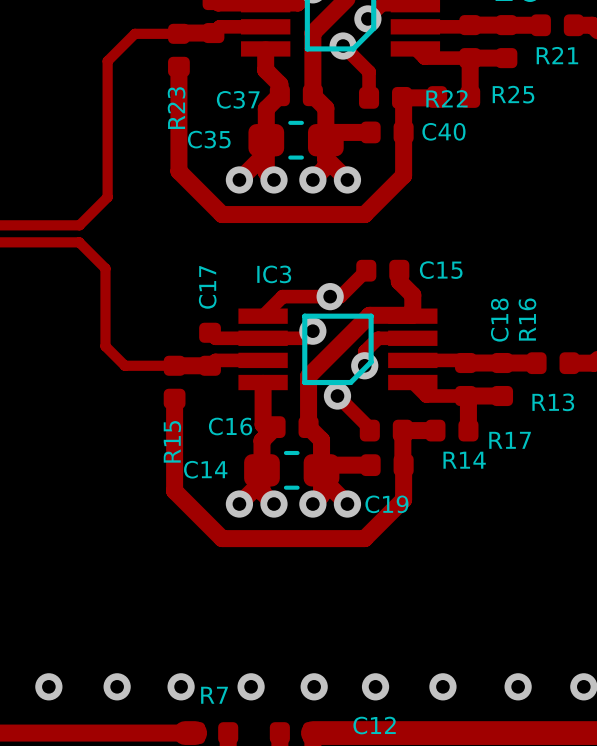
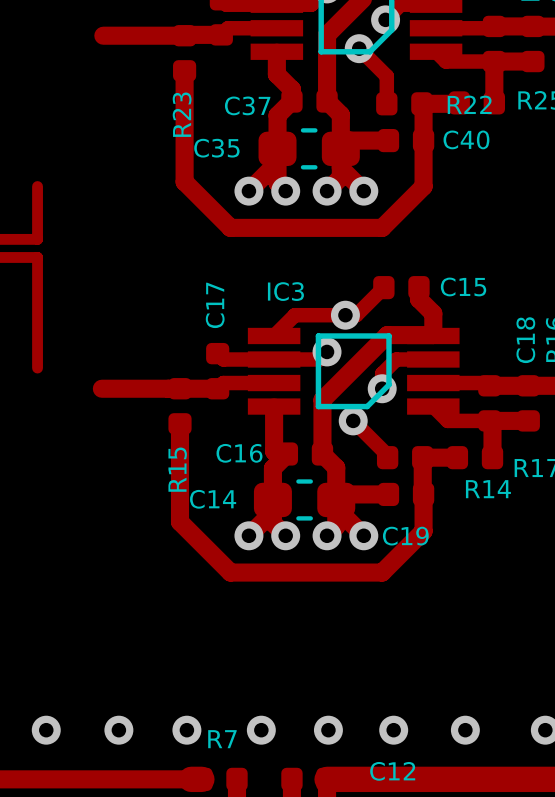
track: none -> (103, 35) (137, 35)
track: (134, 33) (107, 61) (107, 197) (79, 225) (40, 225) -> (37, 186) (37, 239)
track width: thin (134, 33) (178, 33) -> thick (137, 35) (184, 35)
track: (40, 242) (79, 242) (105, 268) (105, 346) (124, 365) -> (37, 257) (37, 368)
track: none -> (101, 388) (127, 388)
track width: thin (124, 365) (174, 365) -> thick (127, 388) (180, 388)

